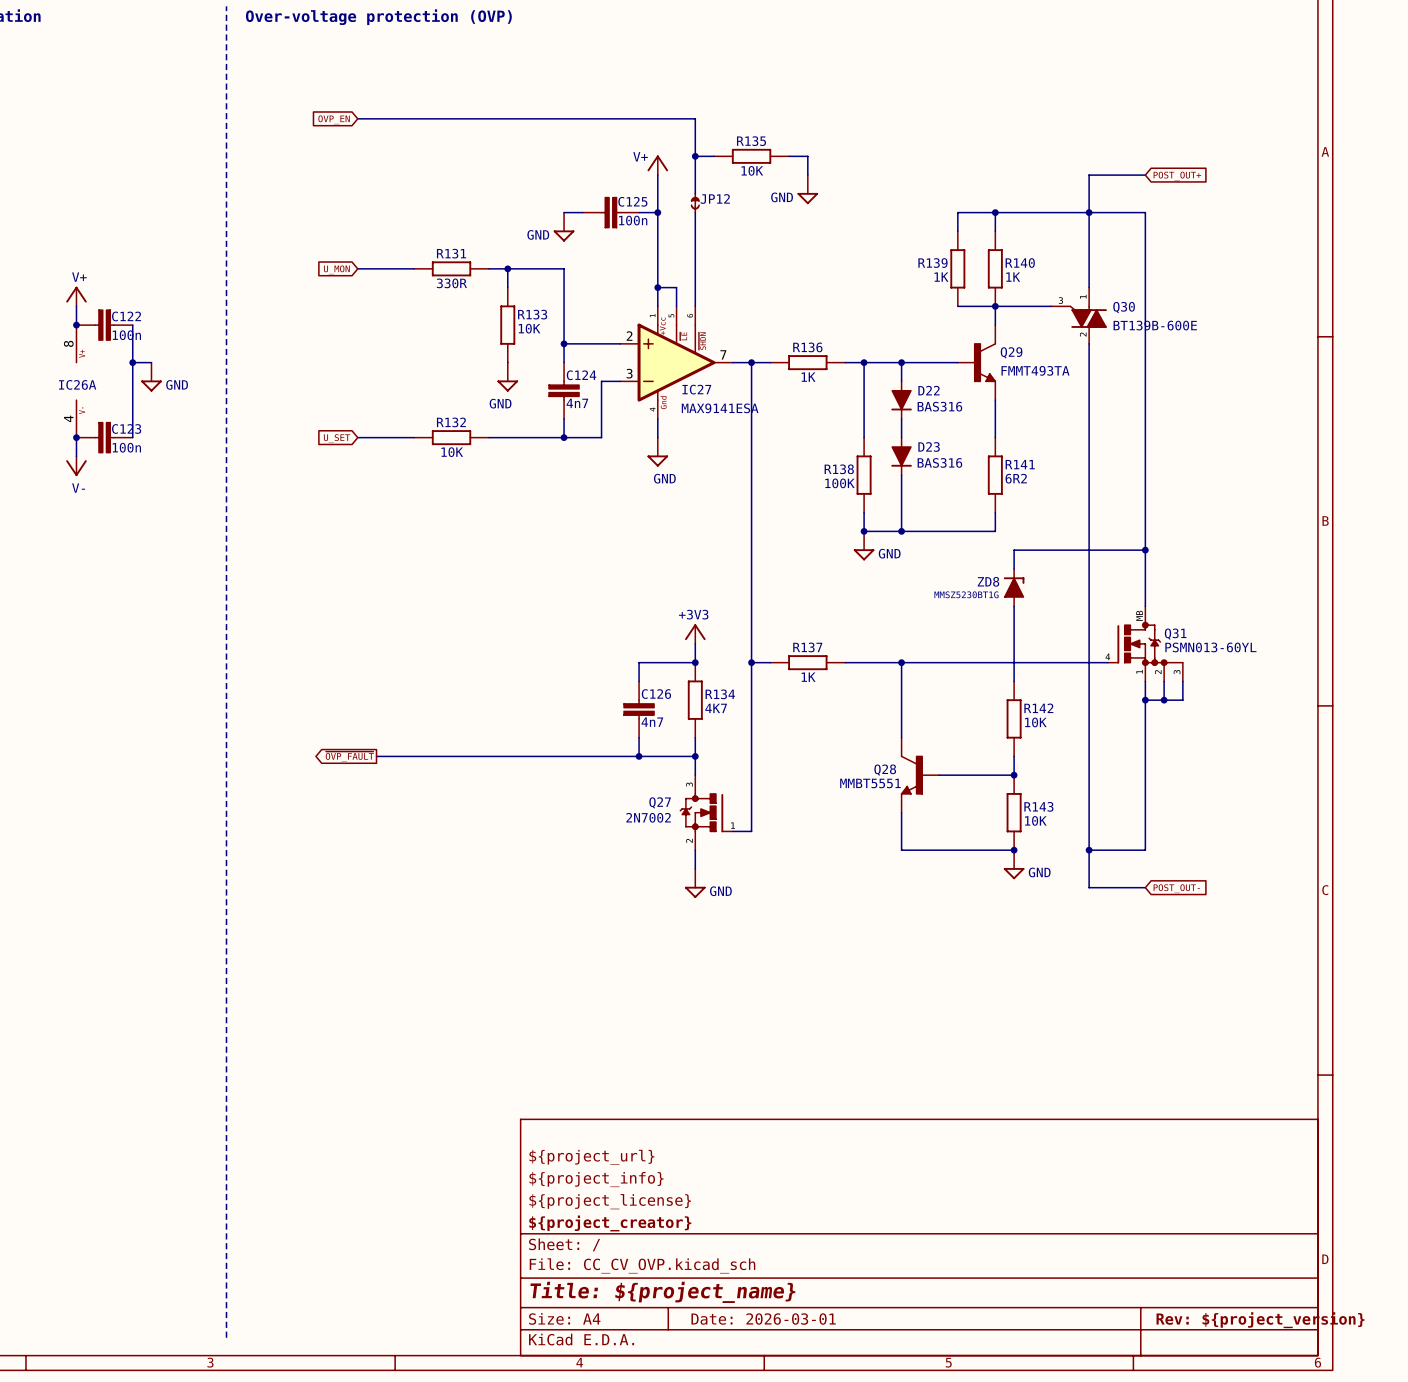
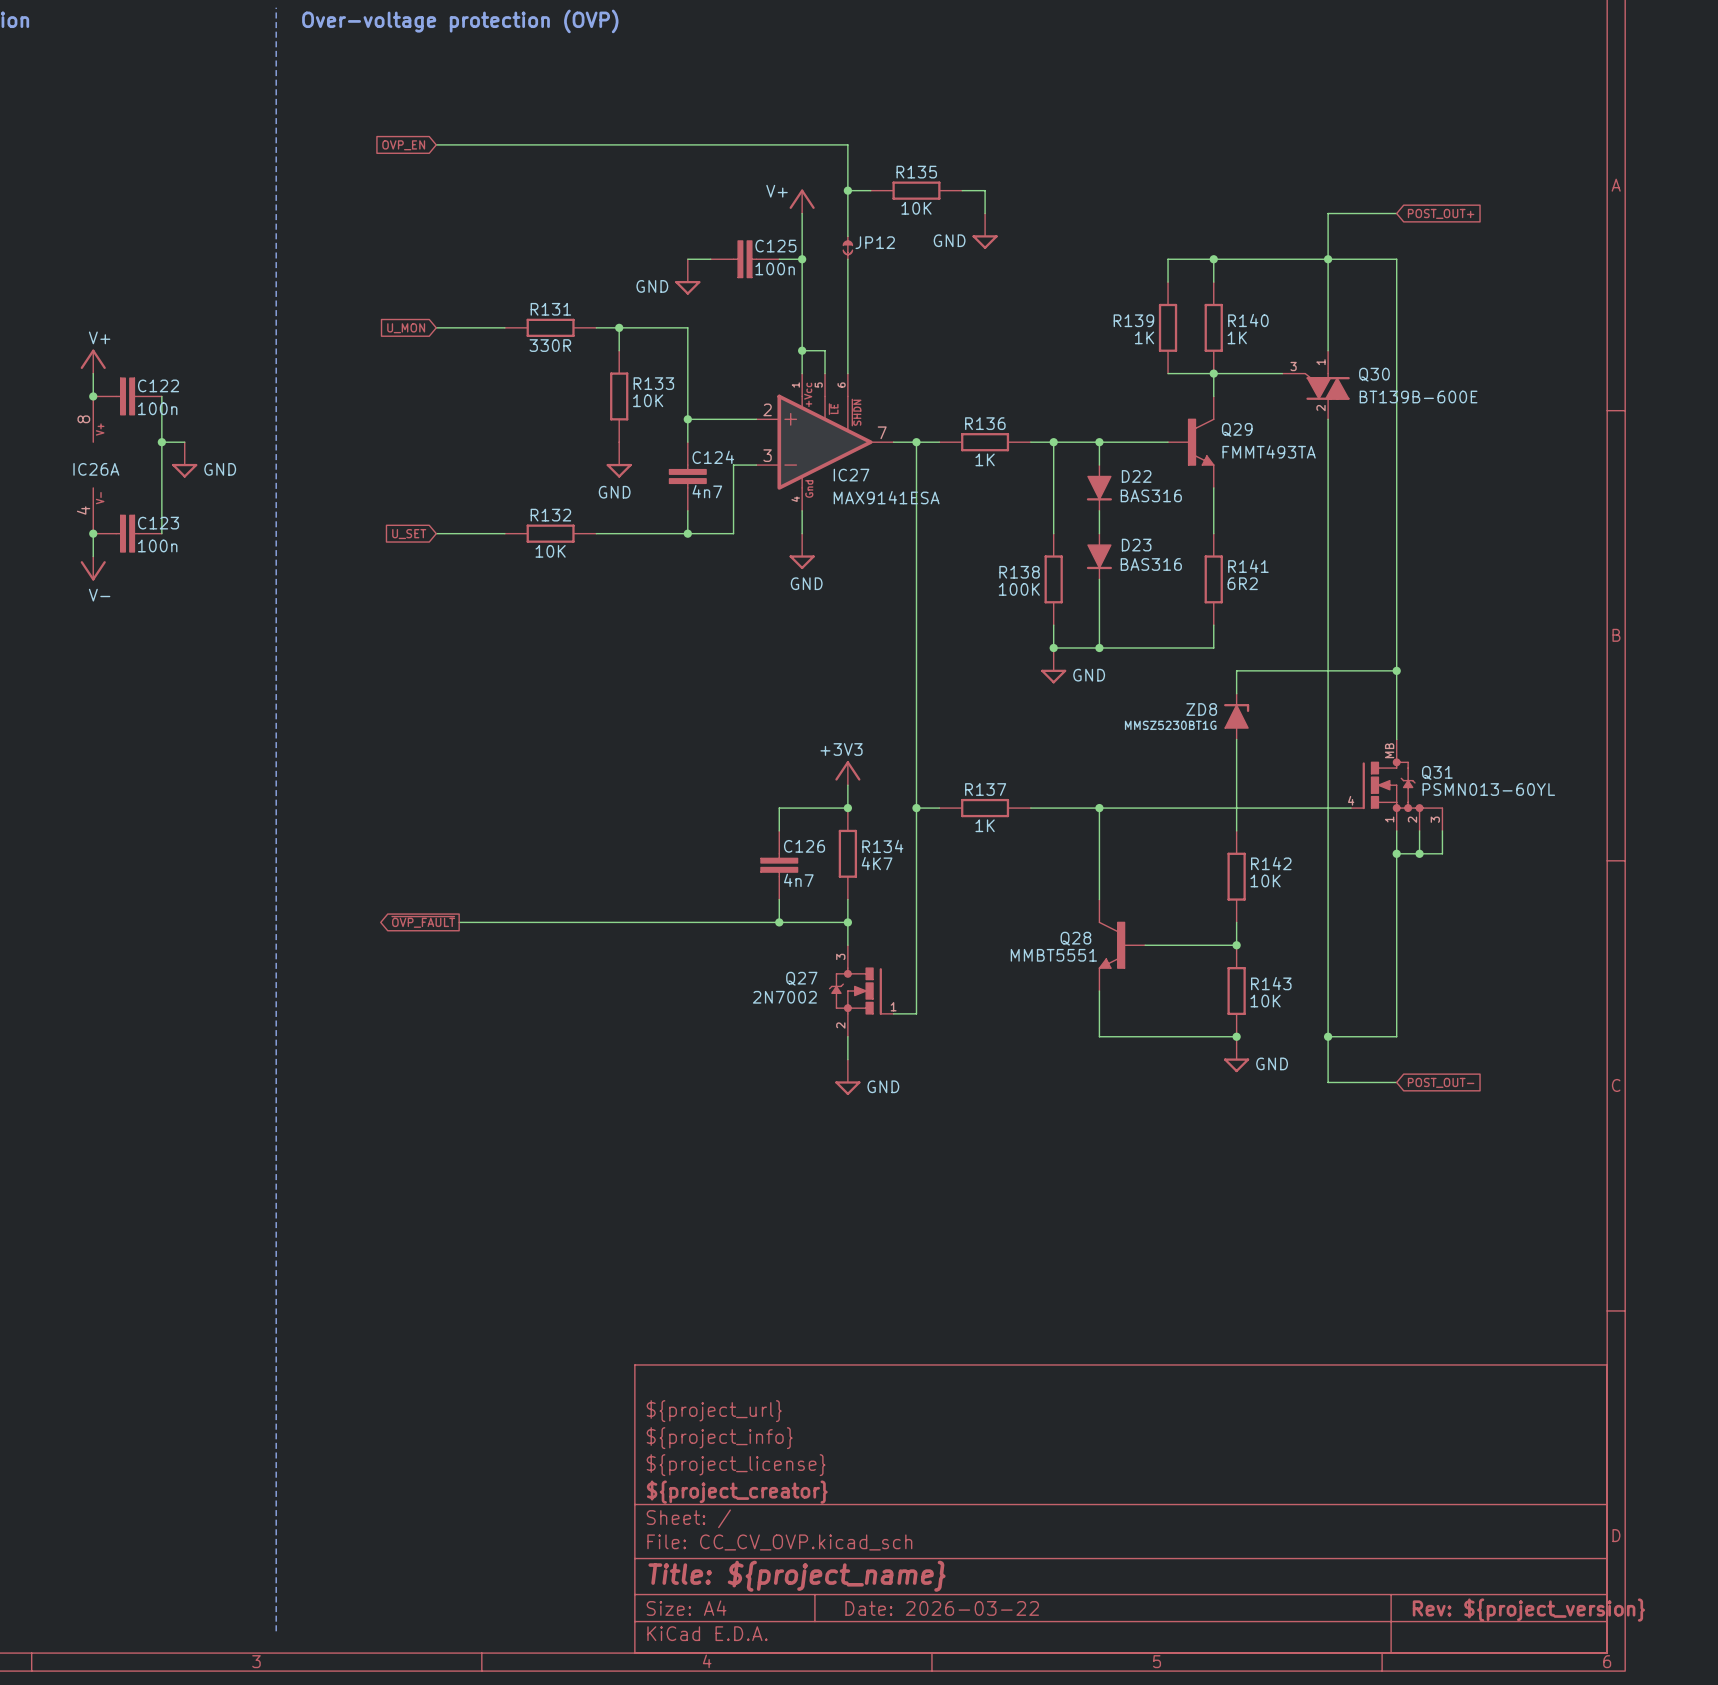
title block: Date: 2026-03-01 (763, 1319) -> Date: 2026-03-22 (942, 1608)

